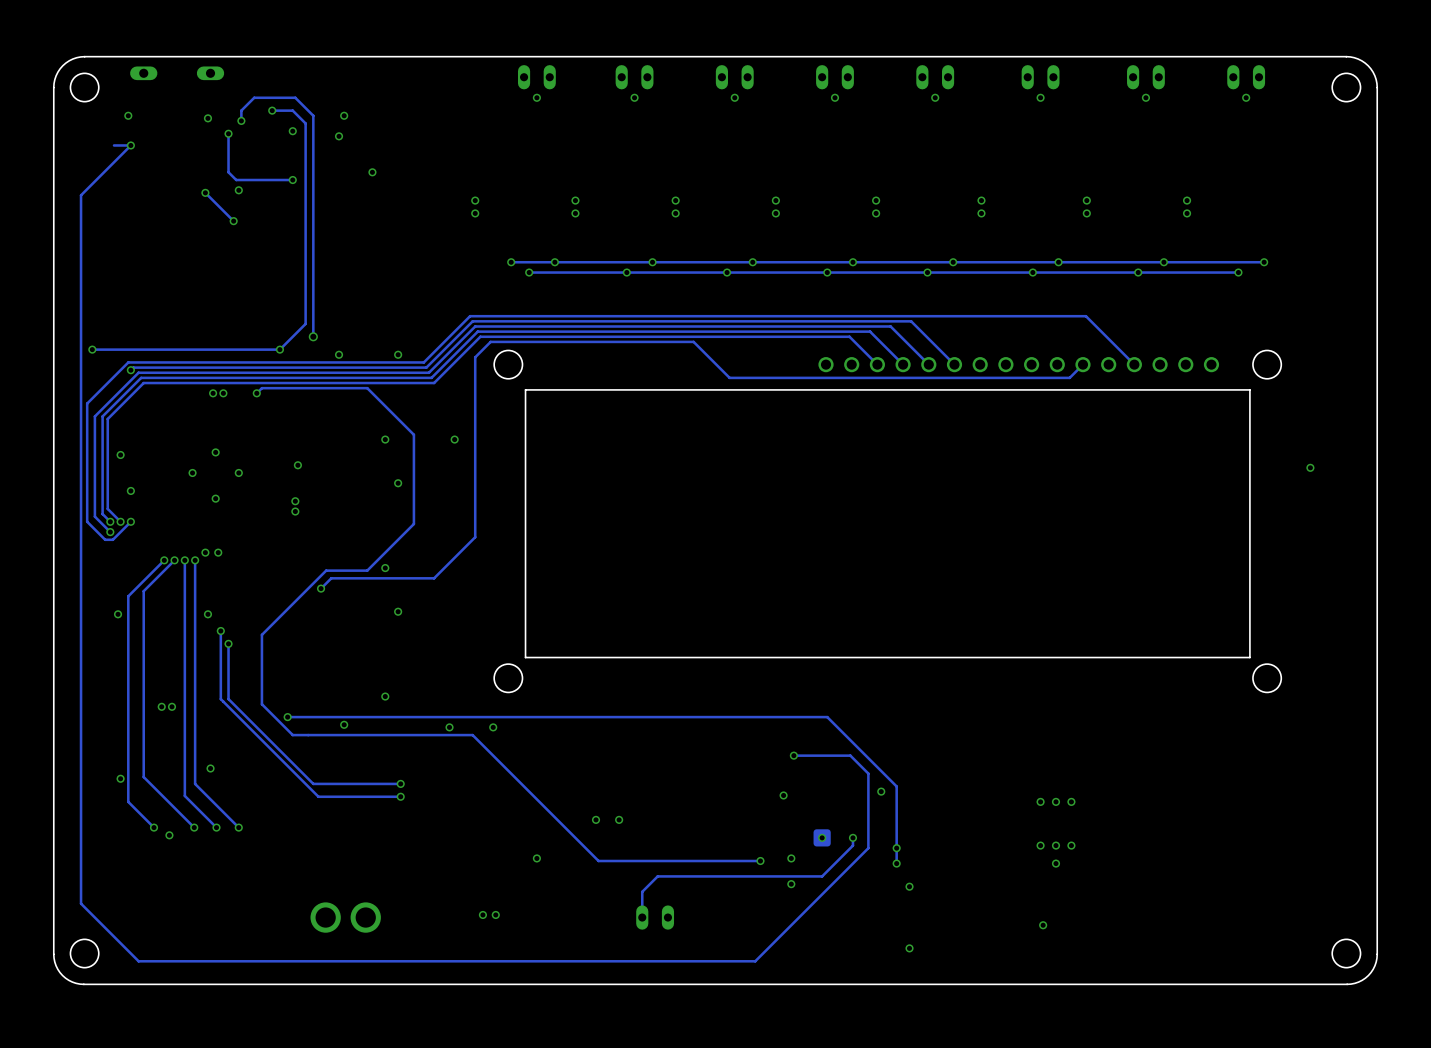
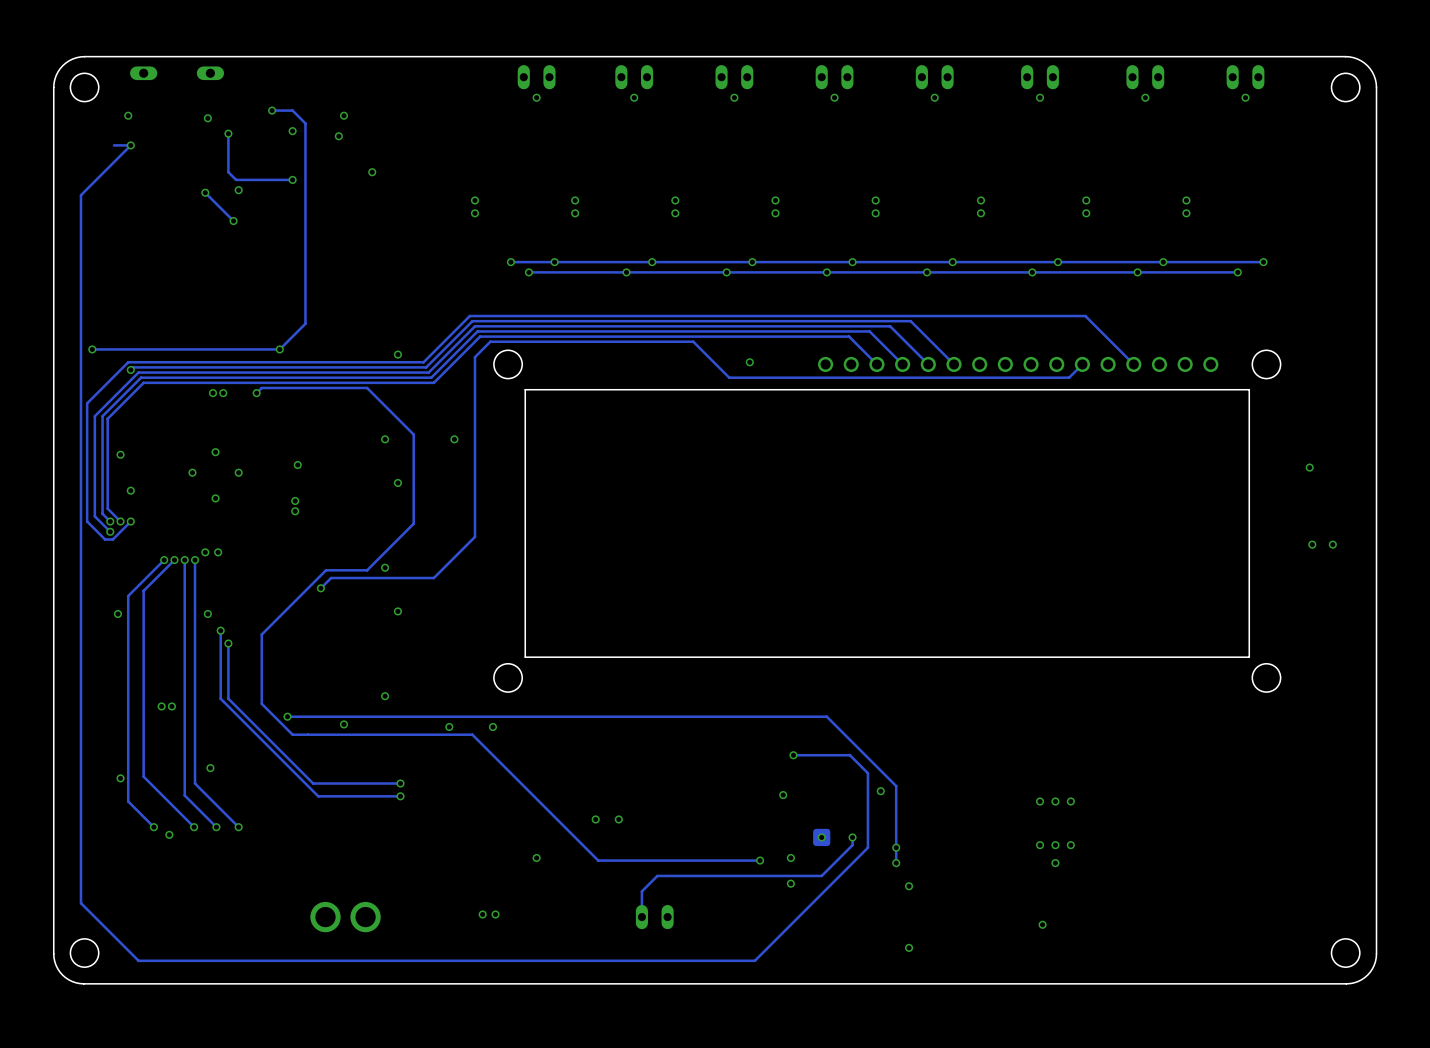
track: (241, 120) (241, 110) (254, 97) (295, 97) (313, 115) (313, 336) -> none
via: (241, 120) -> none
via: (313, 336) -> none
via: (339, 354) -> none
via: none -> (749, 362)
via: none -> (1312, 544)
via: none -> (1332, 544)

